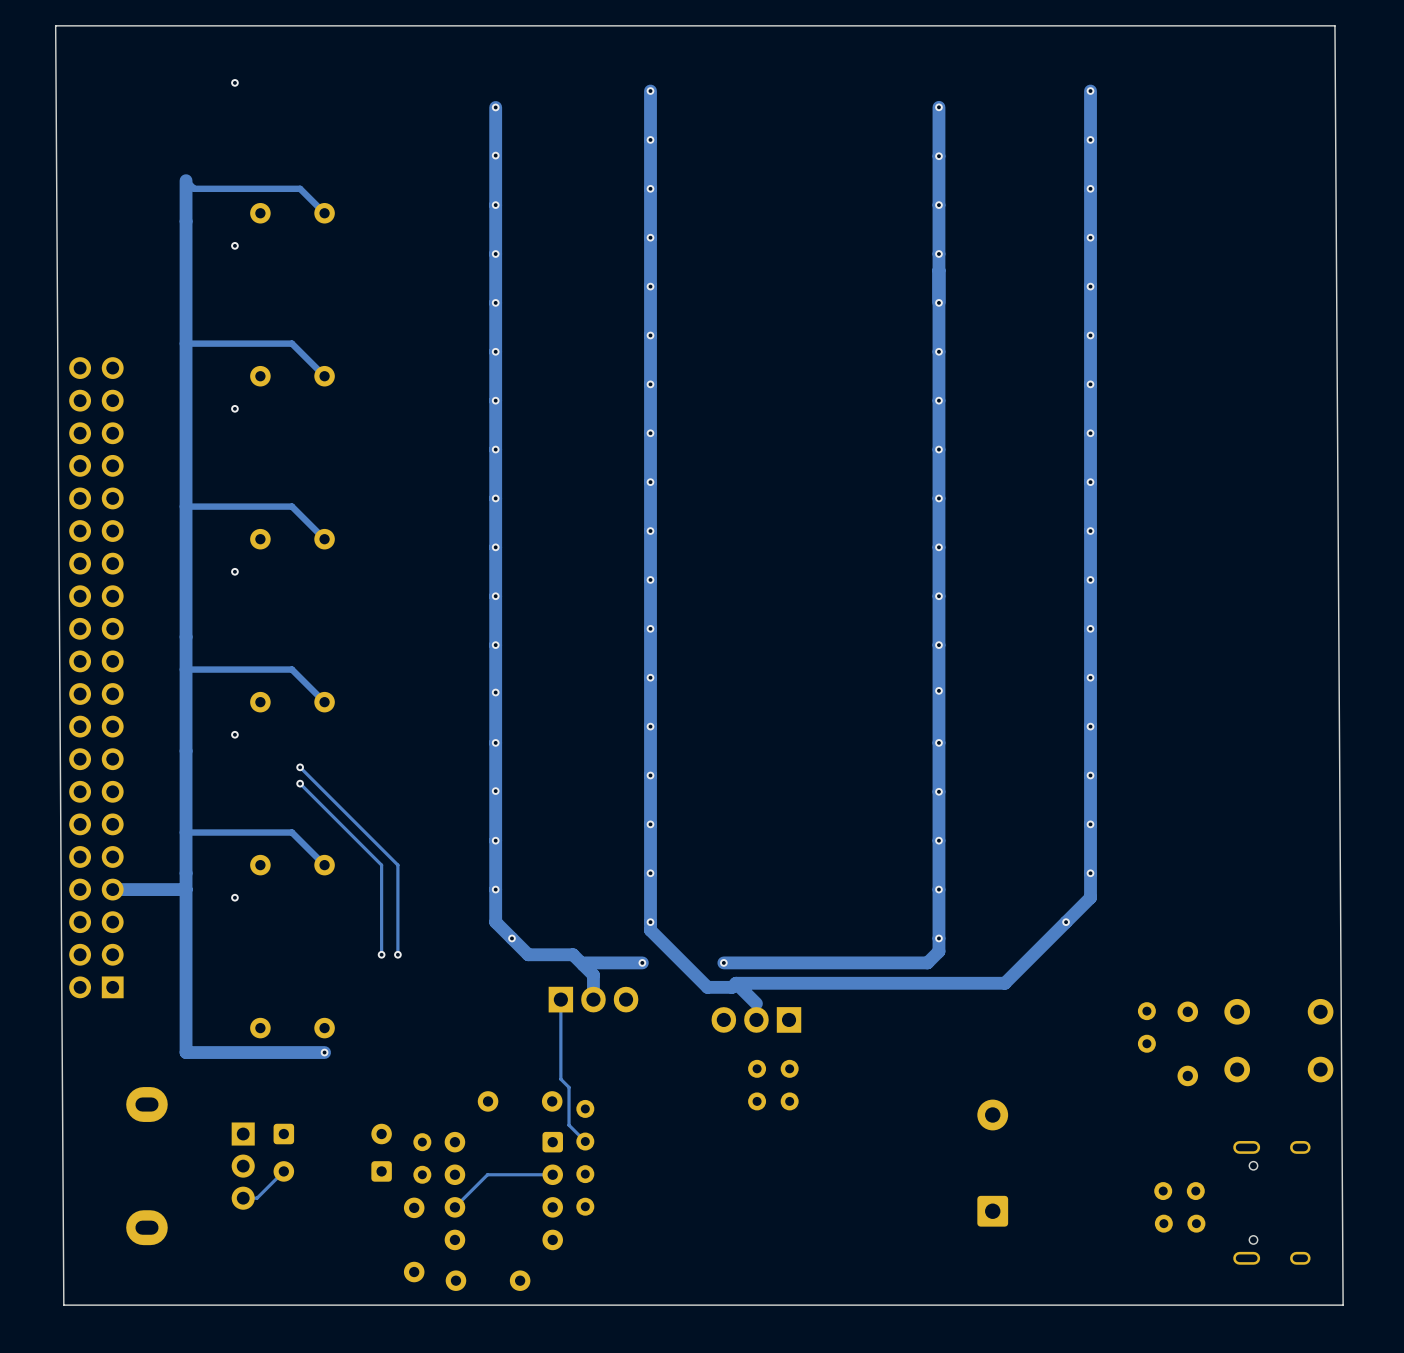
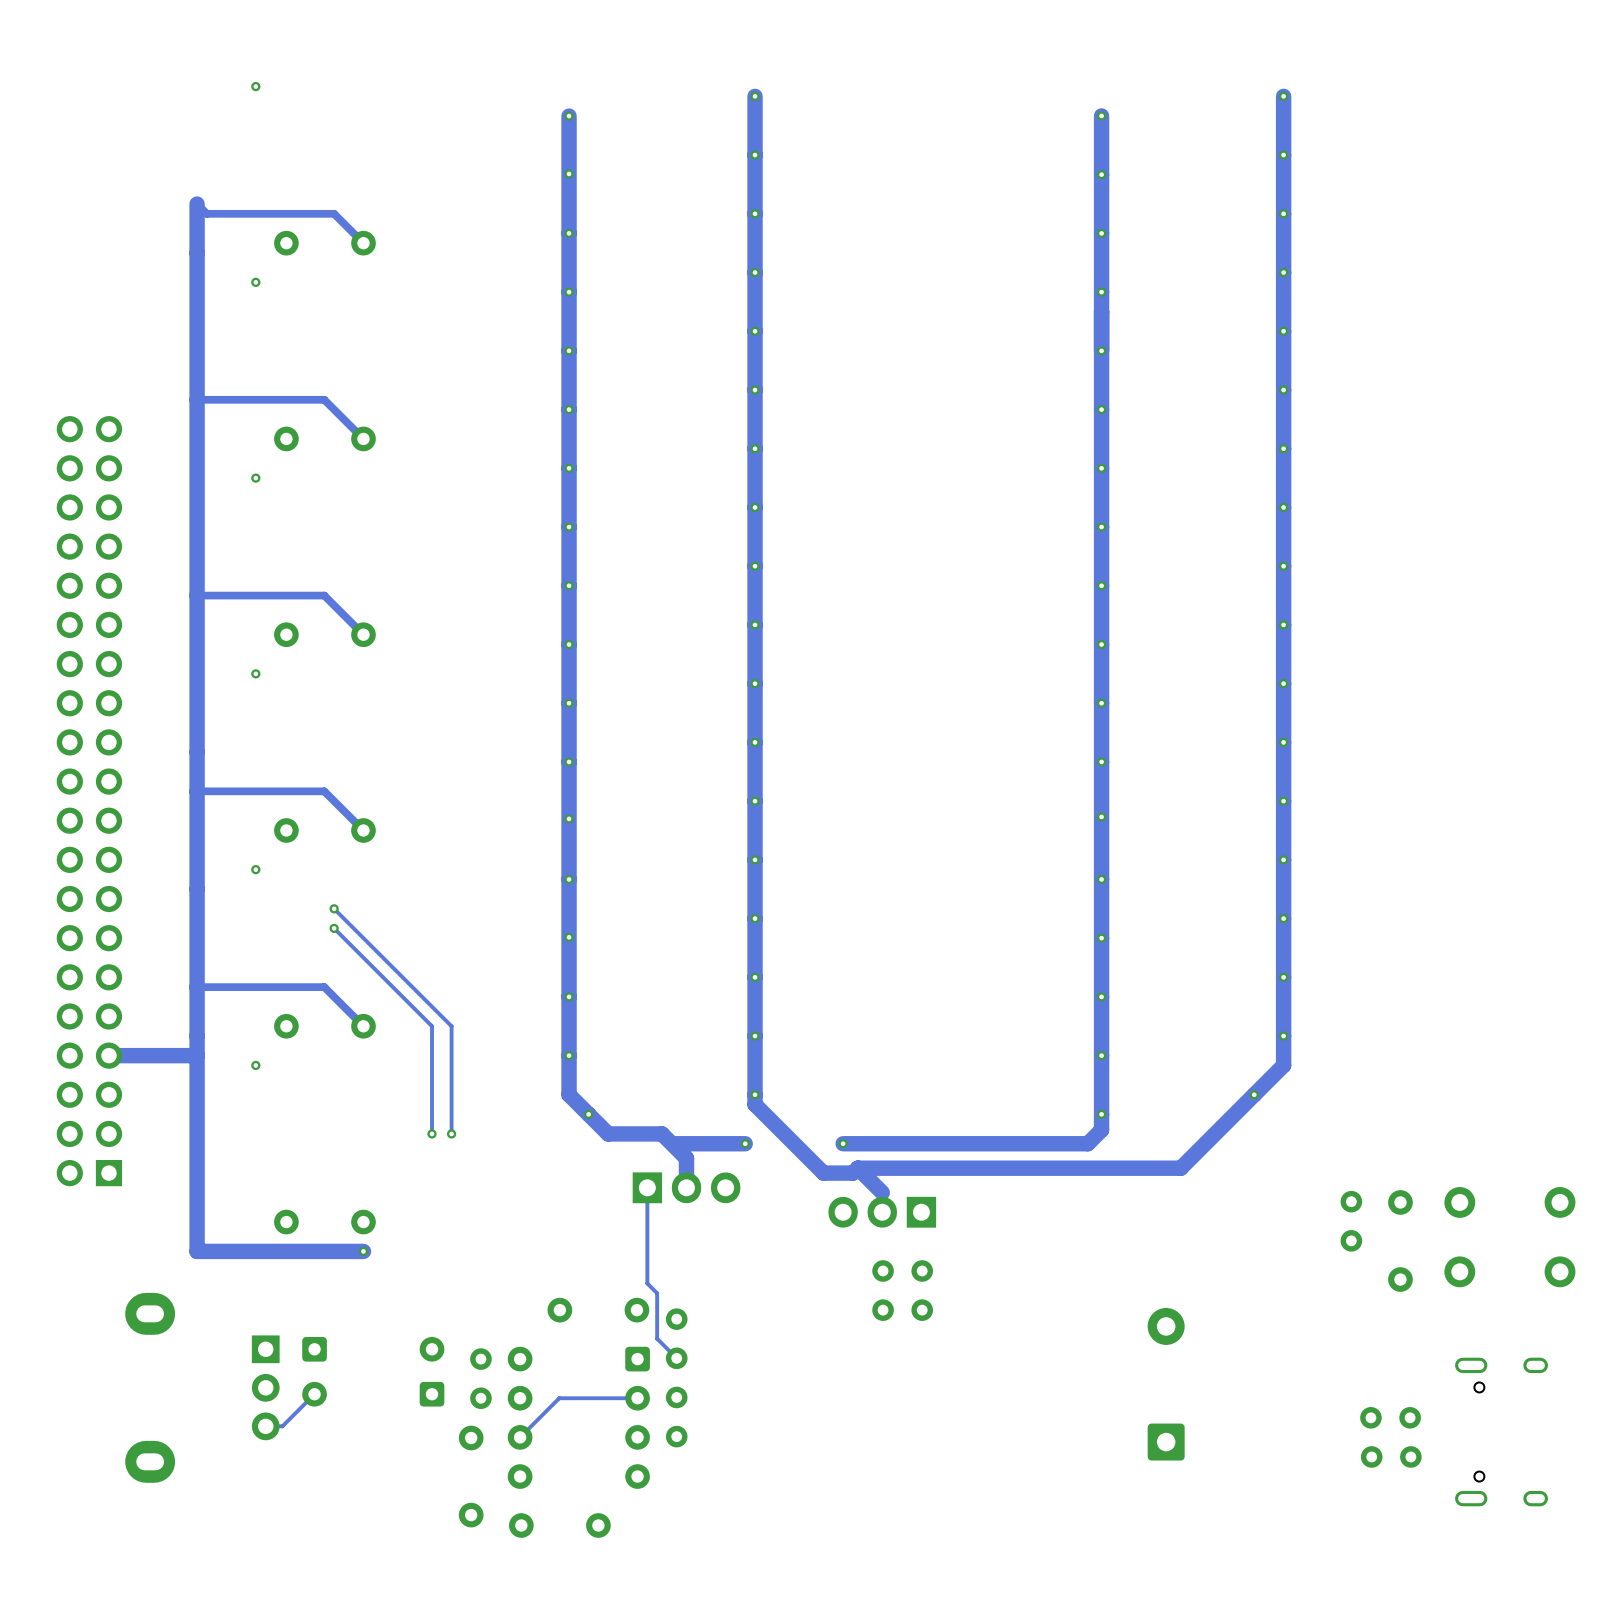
board edge: (1334, 25) (1343, 1305) (63, 1305) (55, 25) (1334, 25) -> none

